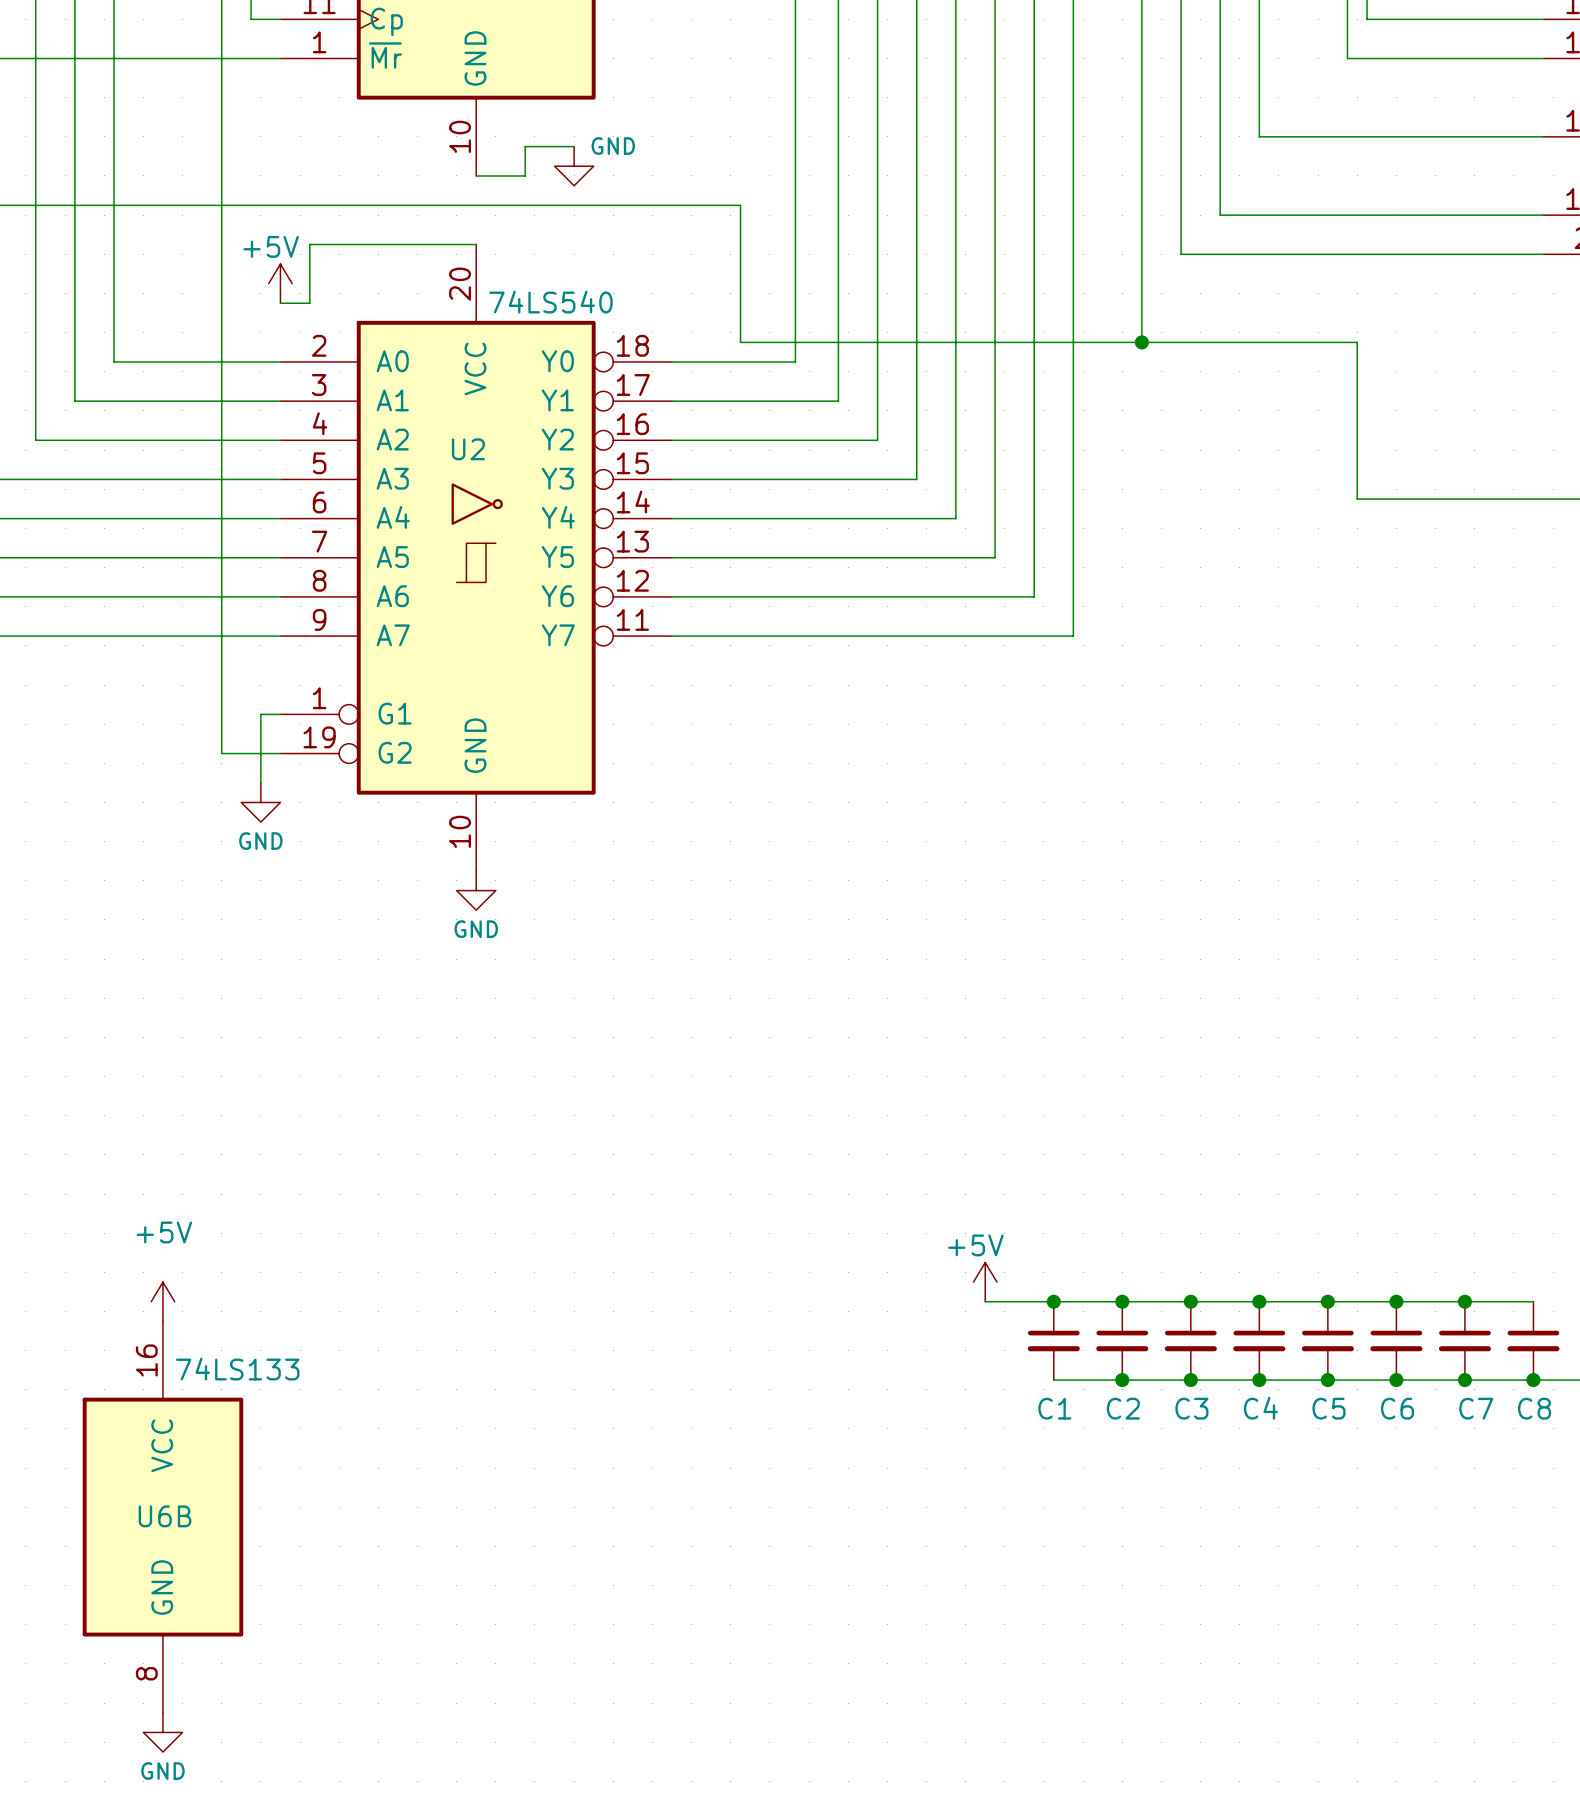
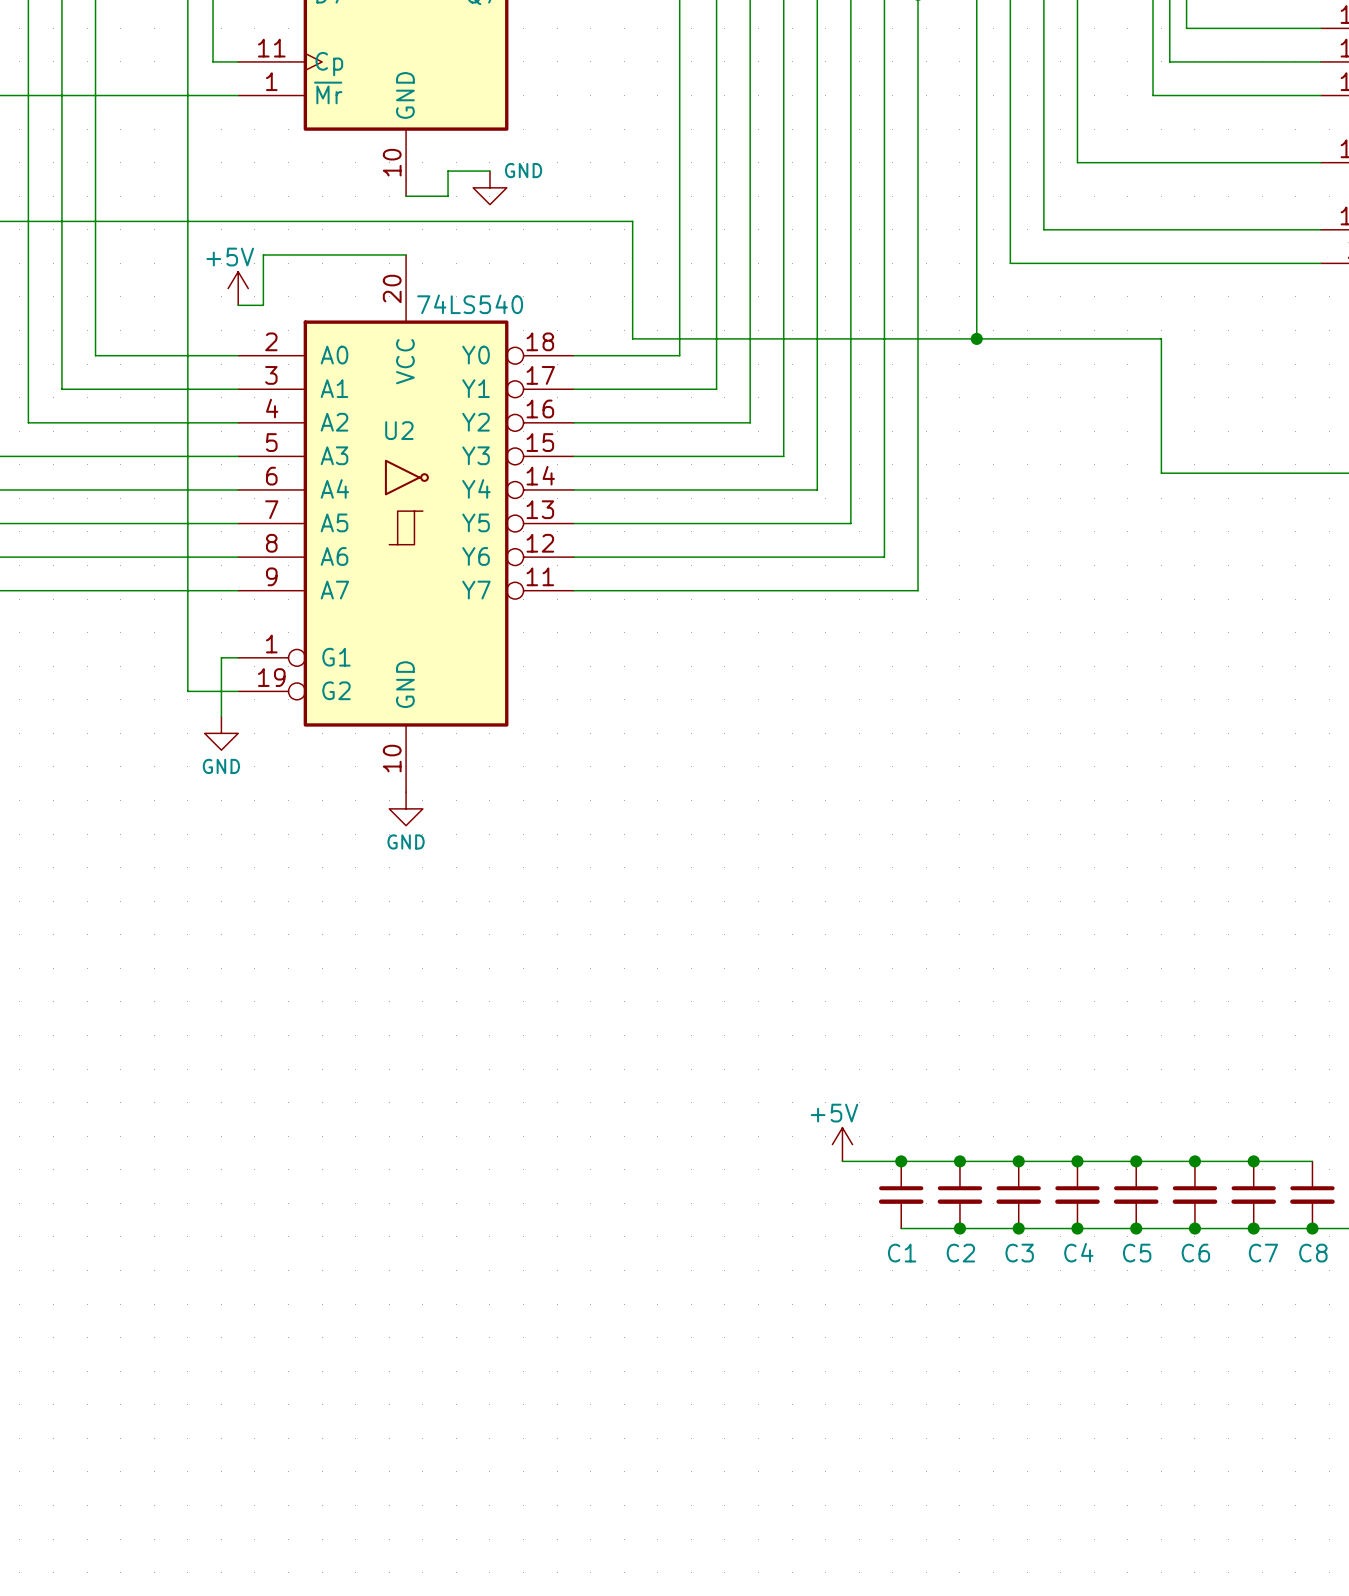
power symbol: +5V (162, 1301) -> none
U6B: 74LS133 (162, 1517) -> none
power symbol: GND (162, 1732) -> none

